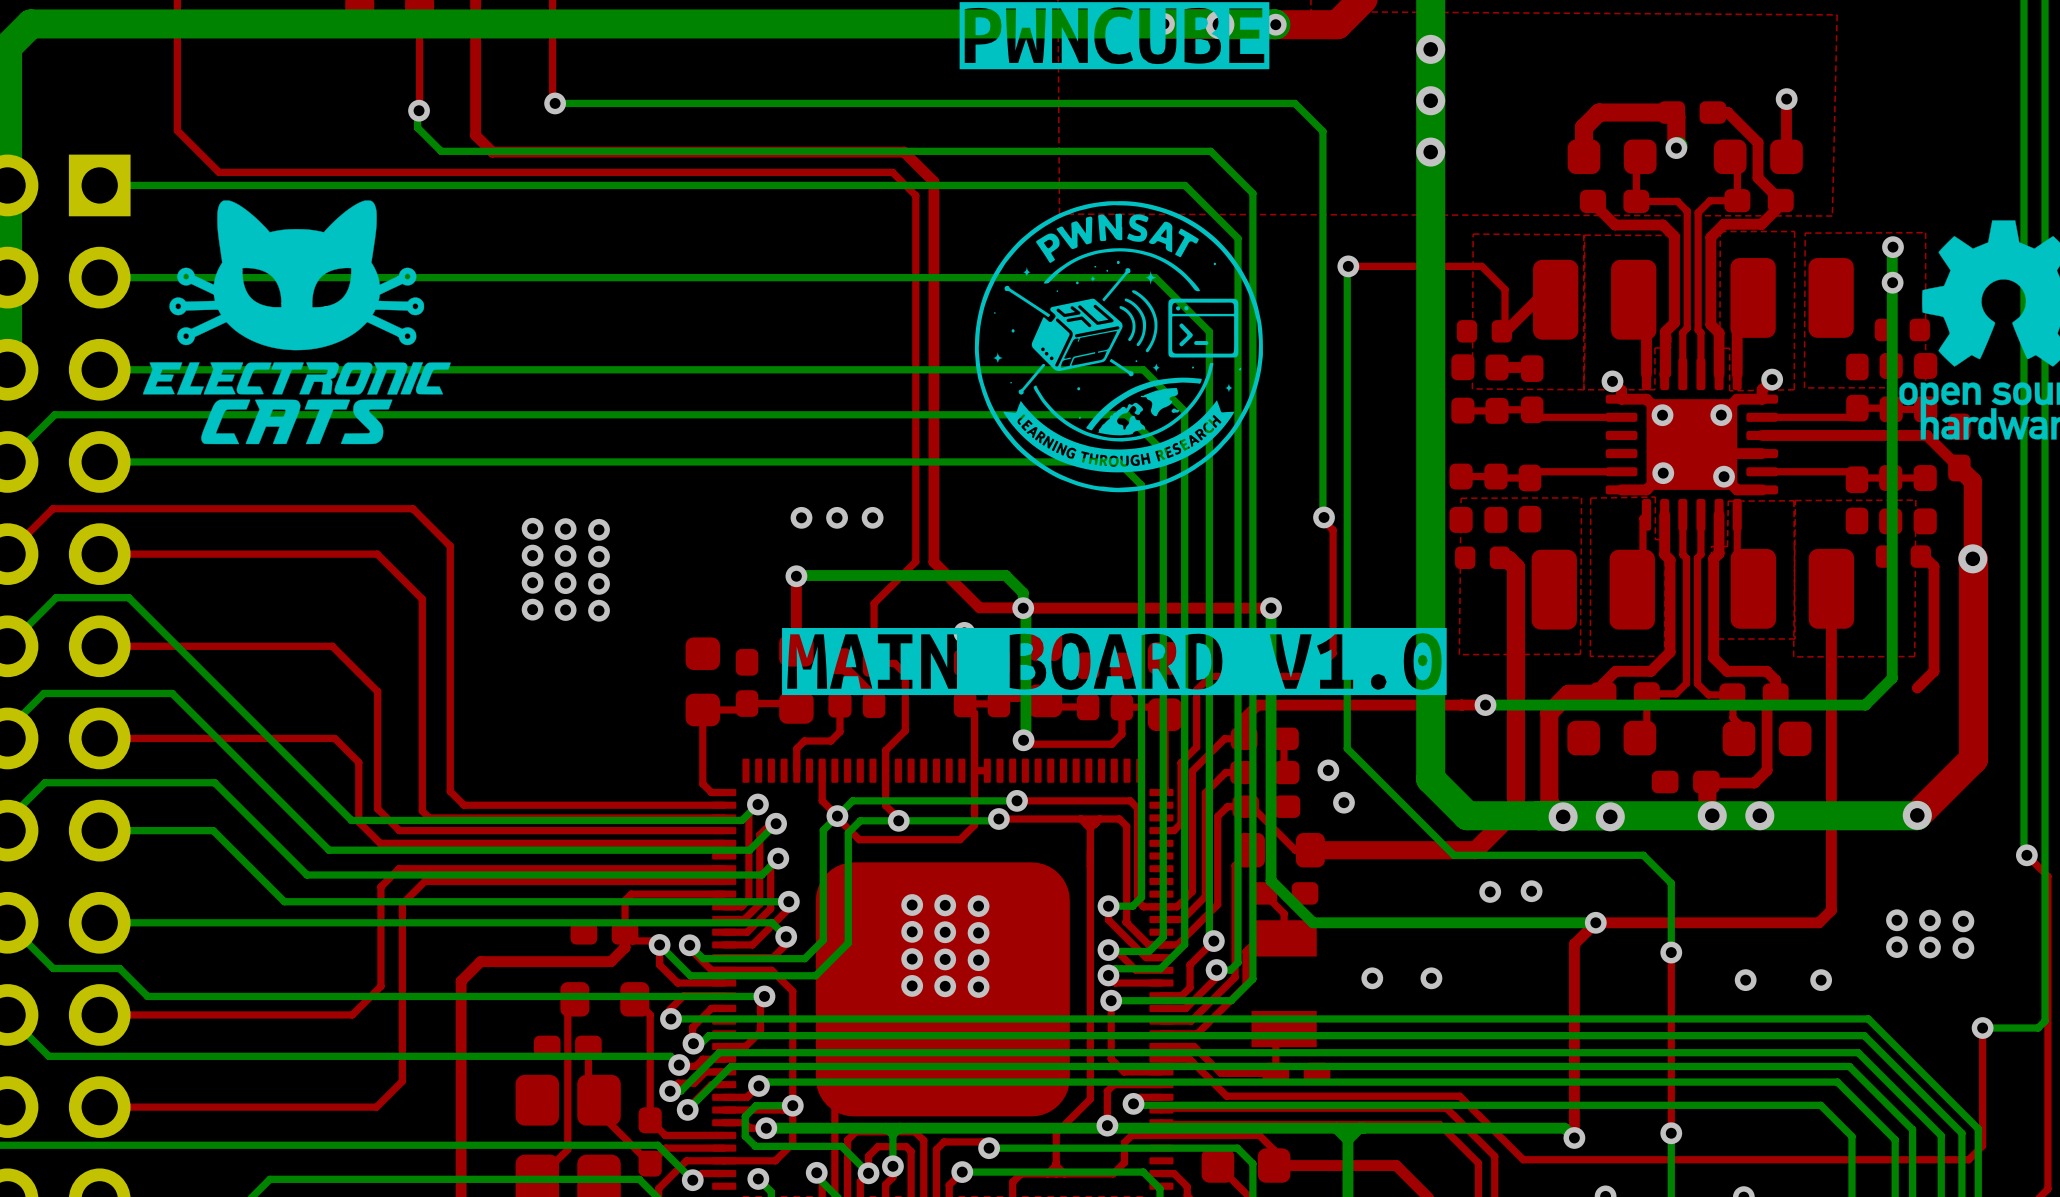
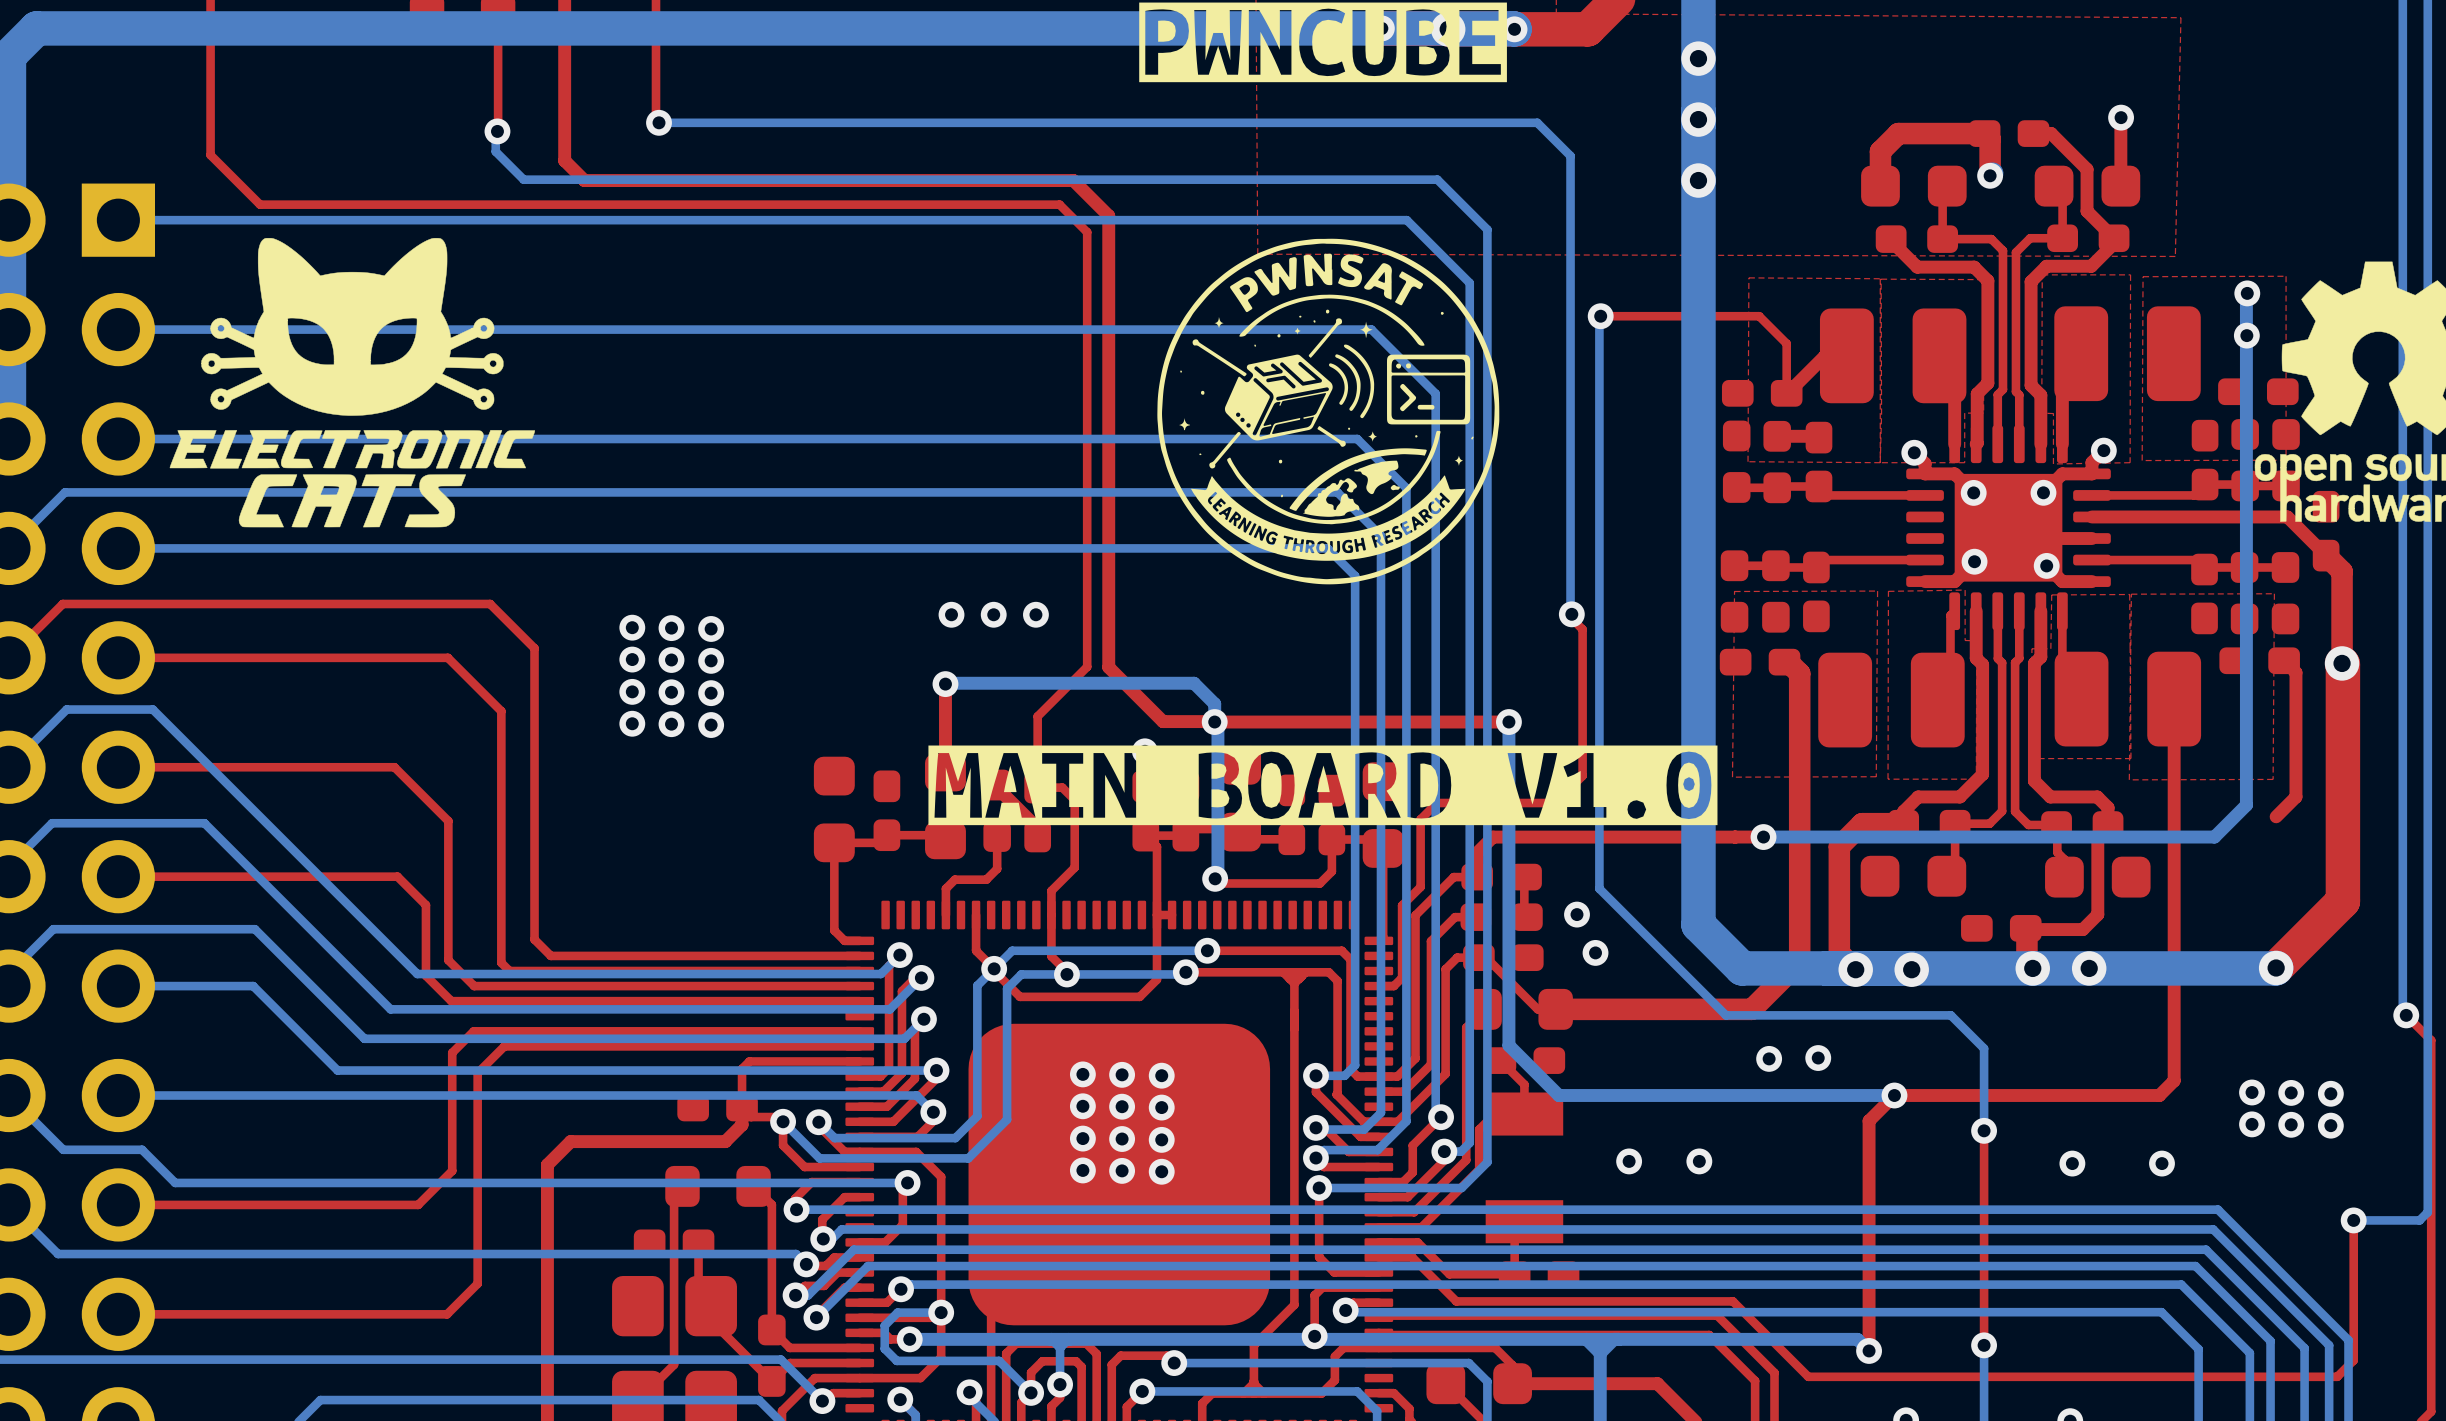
part footprint: [1874, 318, 1930, 342] -> [2218, 378, 2299, 406]
part footprint: [1456, 320, 1512, 343] -> [1721, 379, 1803, 407]
part footprint: [1875, 545, 1932, 568] -> [2219, 647, 2300, 675]
part footprint: [1455, 546, 1511, 570] -> [1719, 648, 1801, 676]

